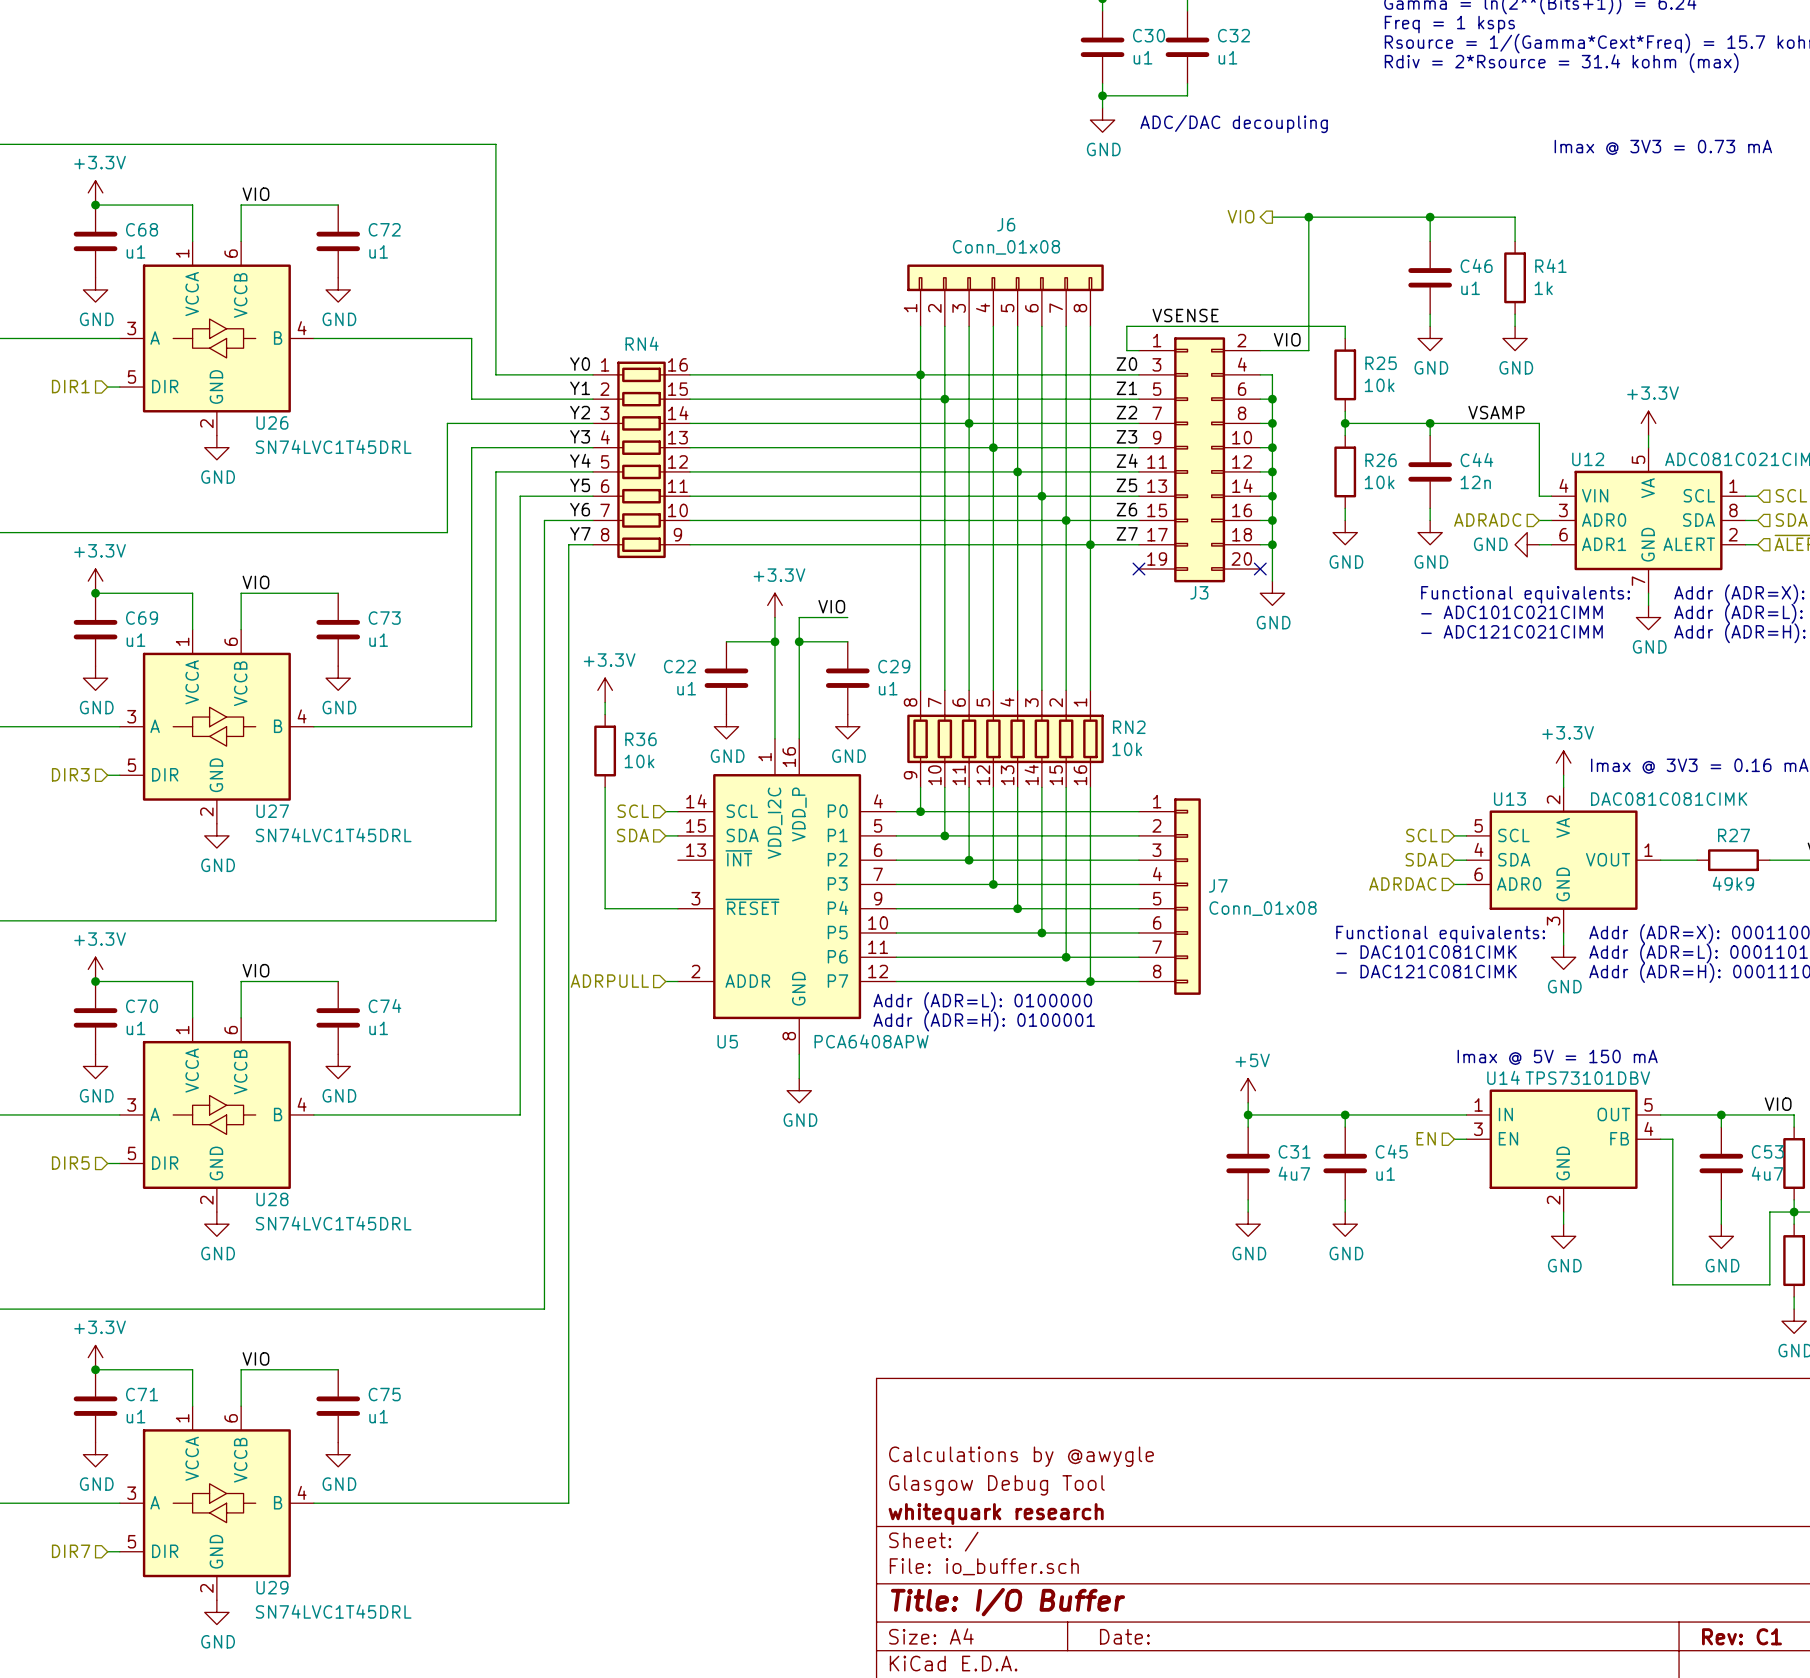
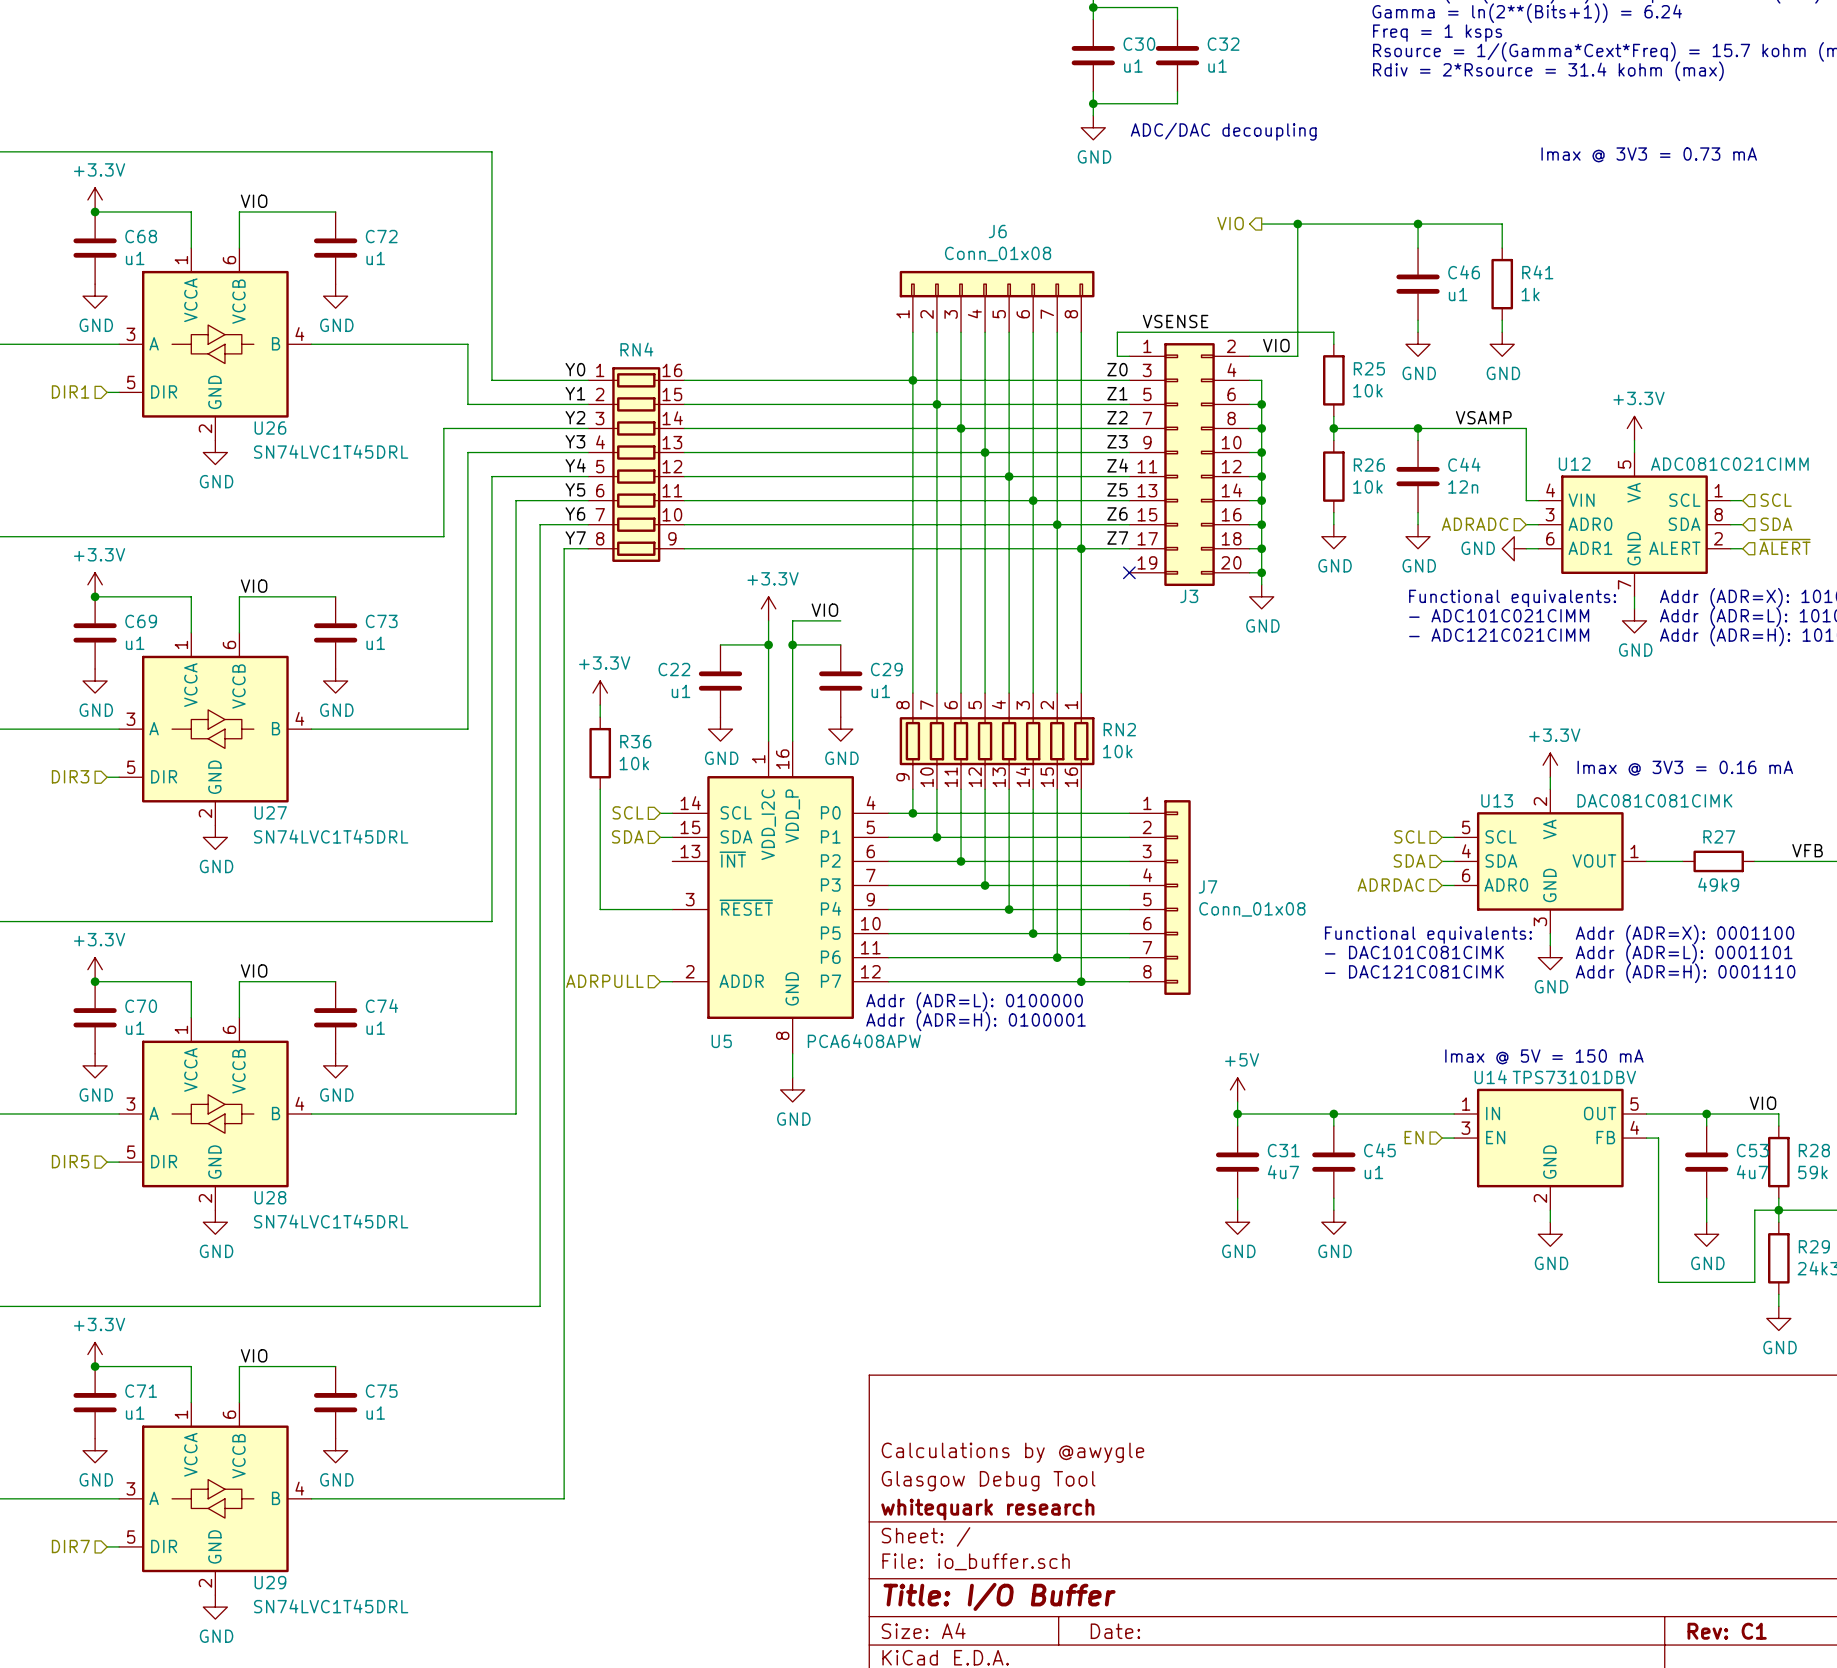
wire: none -> (1249, 572) (1261, 572)
no-connect mark: (1260, 569) -> none
junction: none -> (1261, 572)

